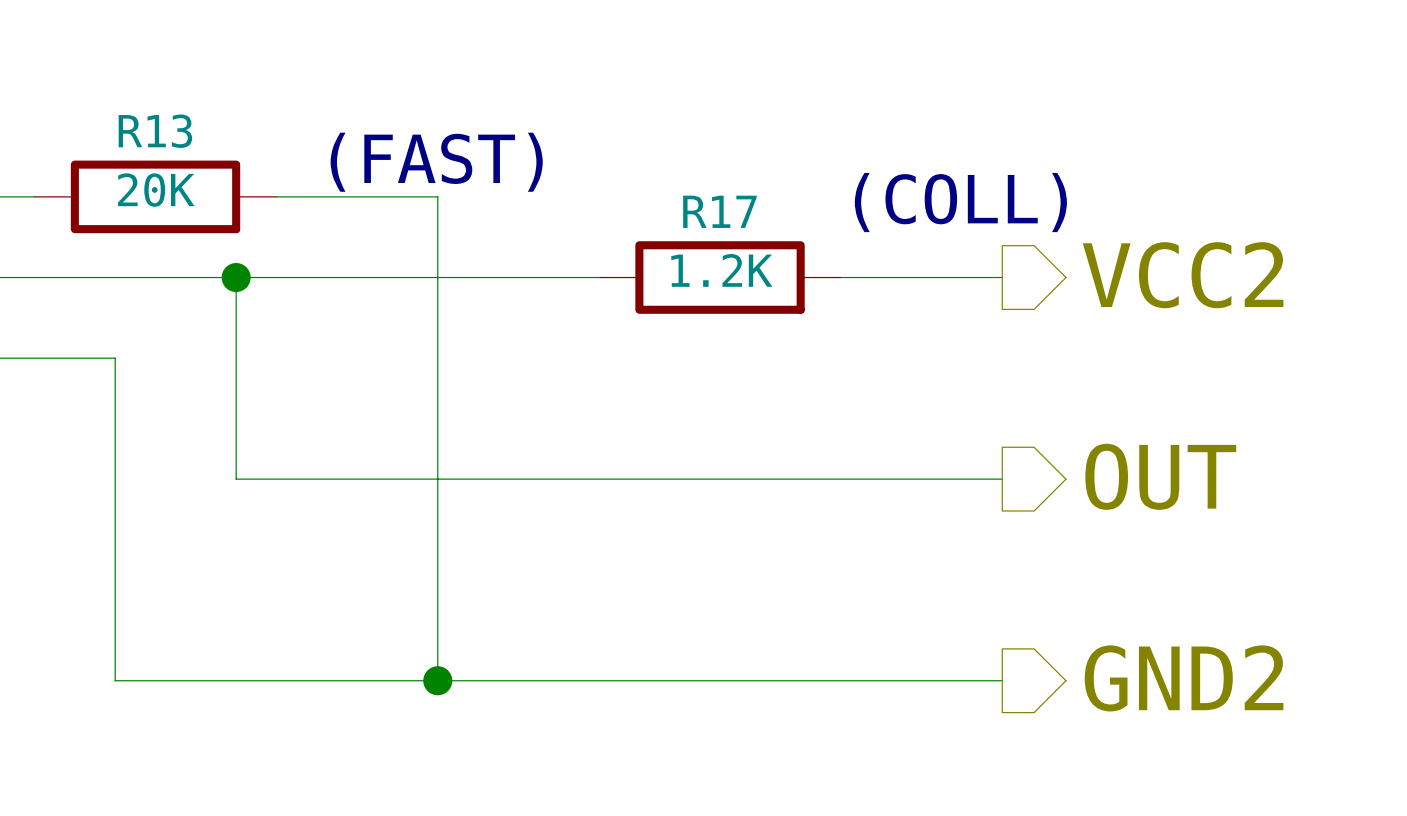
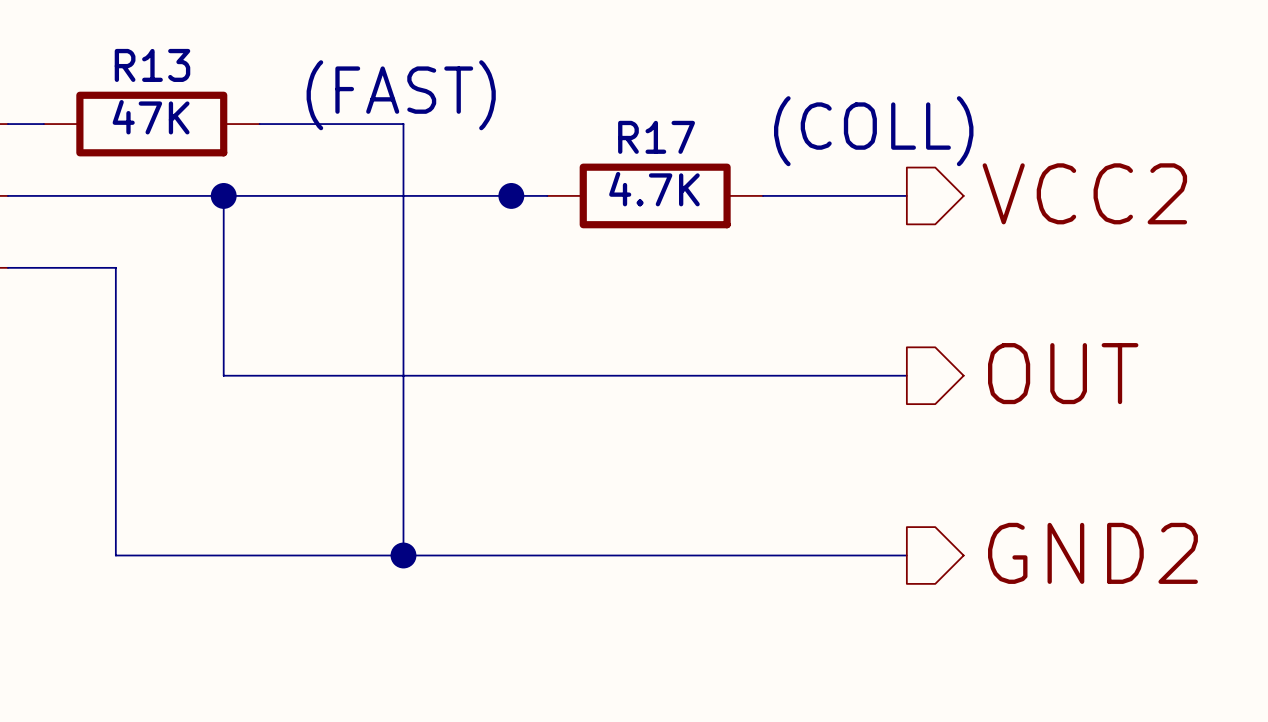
R13 value: 20K (156, 190) -> 47K (151, 117)
R17 value: 1.2K (721, 270) -> 4.7K (654, 189)
junction: none -> (511, 195)

